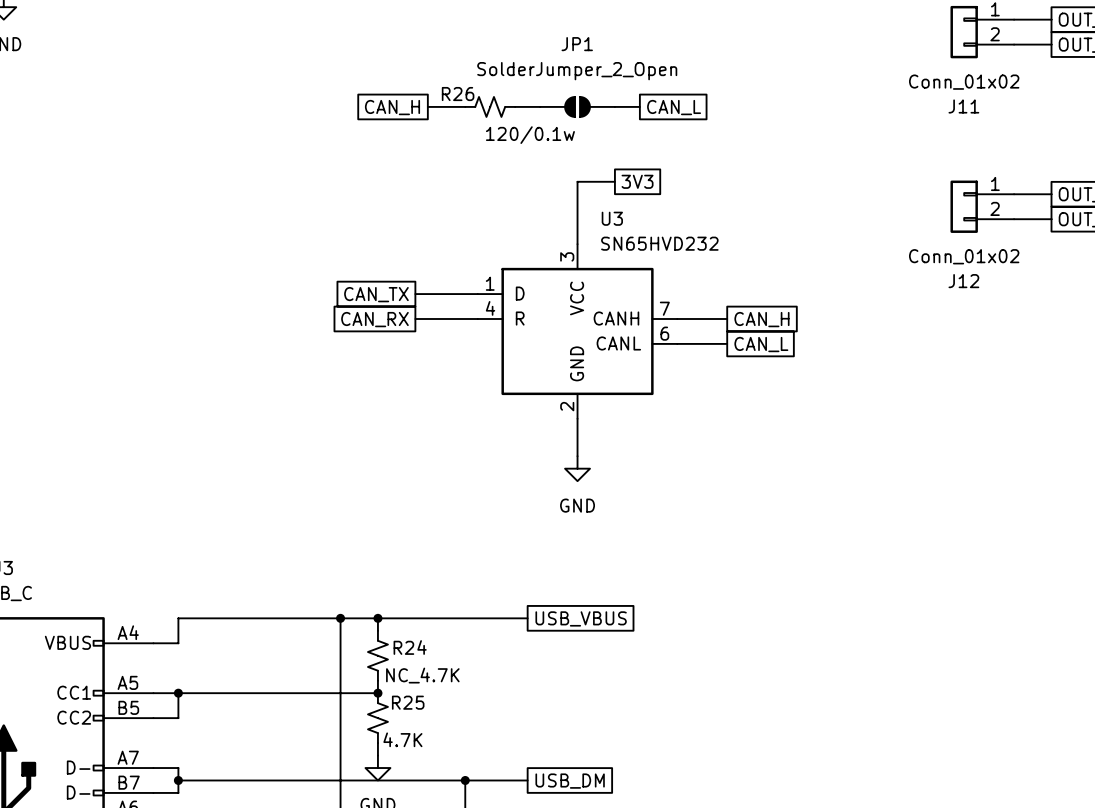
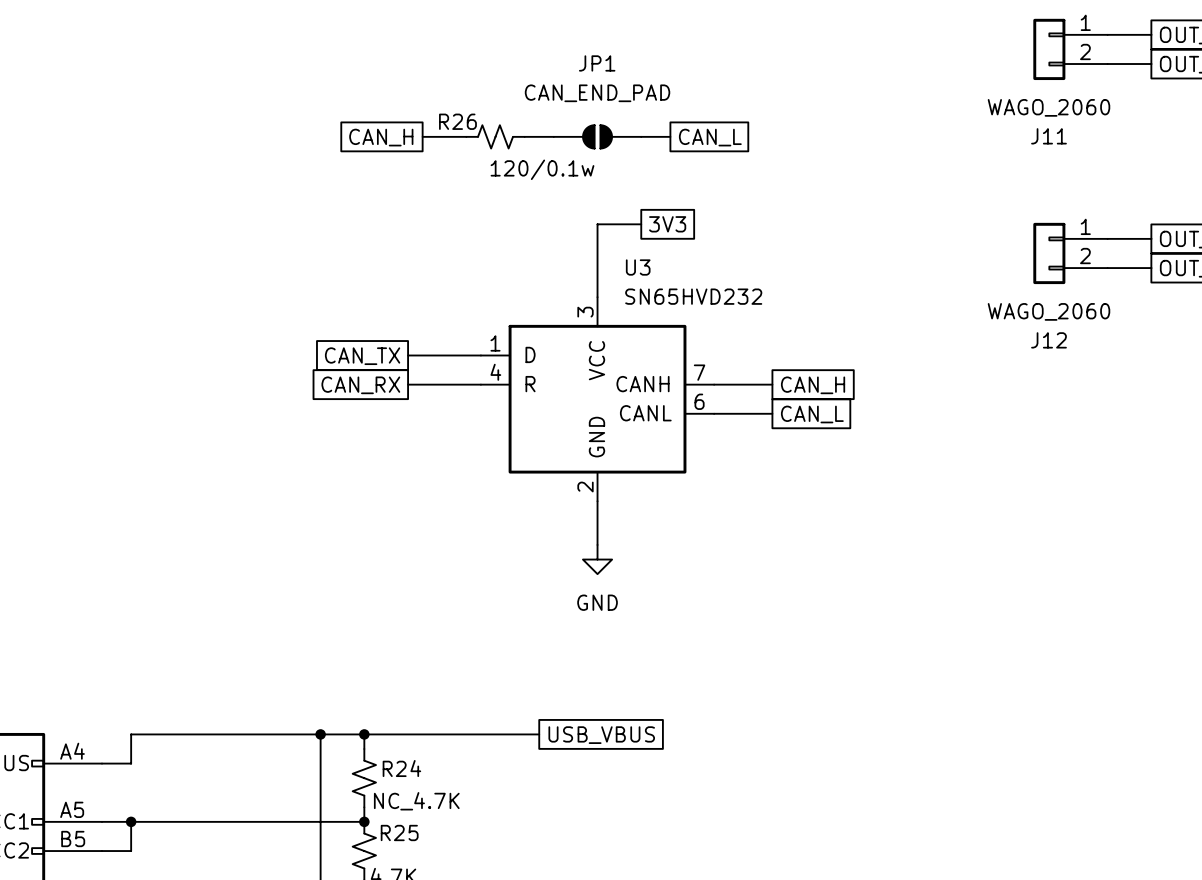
JP1 value: SolderJumper_2_Open (577, 71) -> CAN_END_PAD (597, 93)
J11 value: Conn_01x02 (964, 82) -> WAGO_2060 (1048, 107)
J12 value: Conn_01x02 (964, 256) -> WAGO_2060 (1048, 311)

